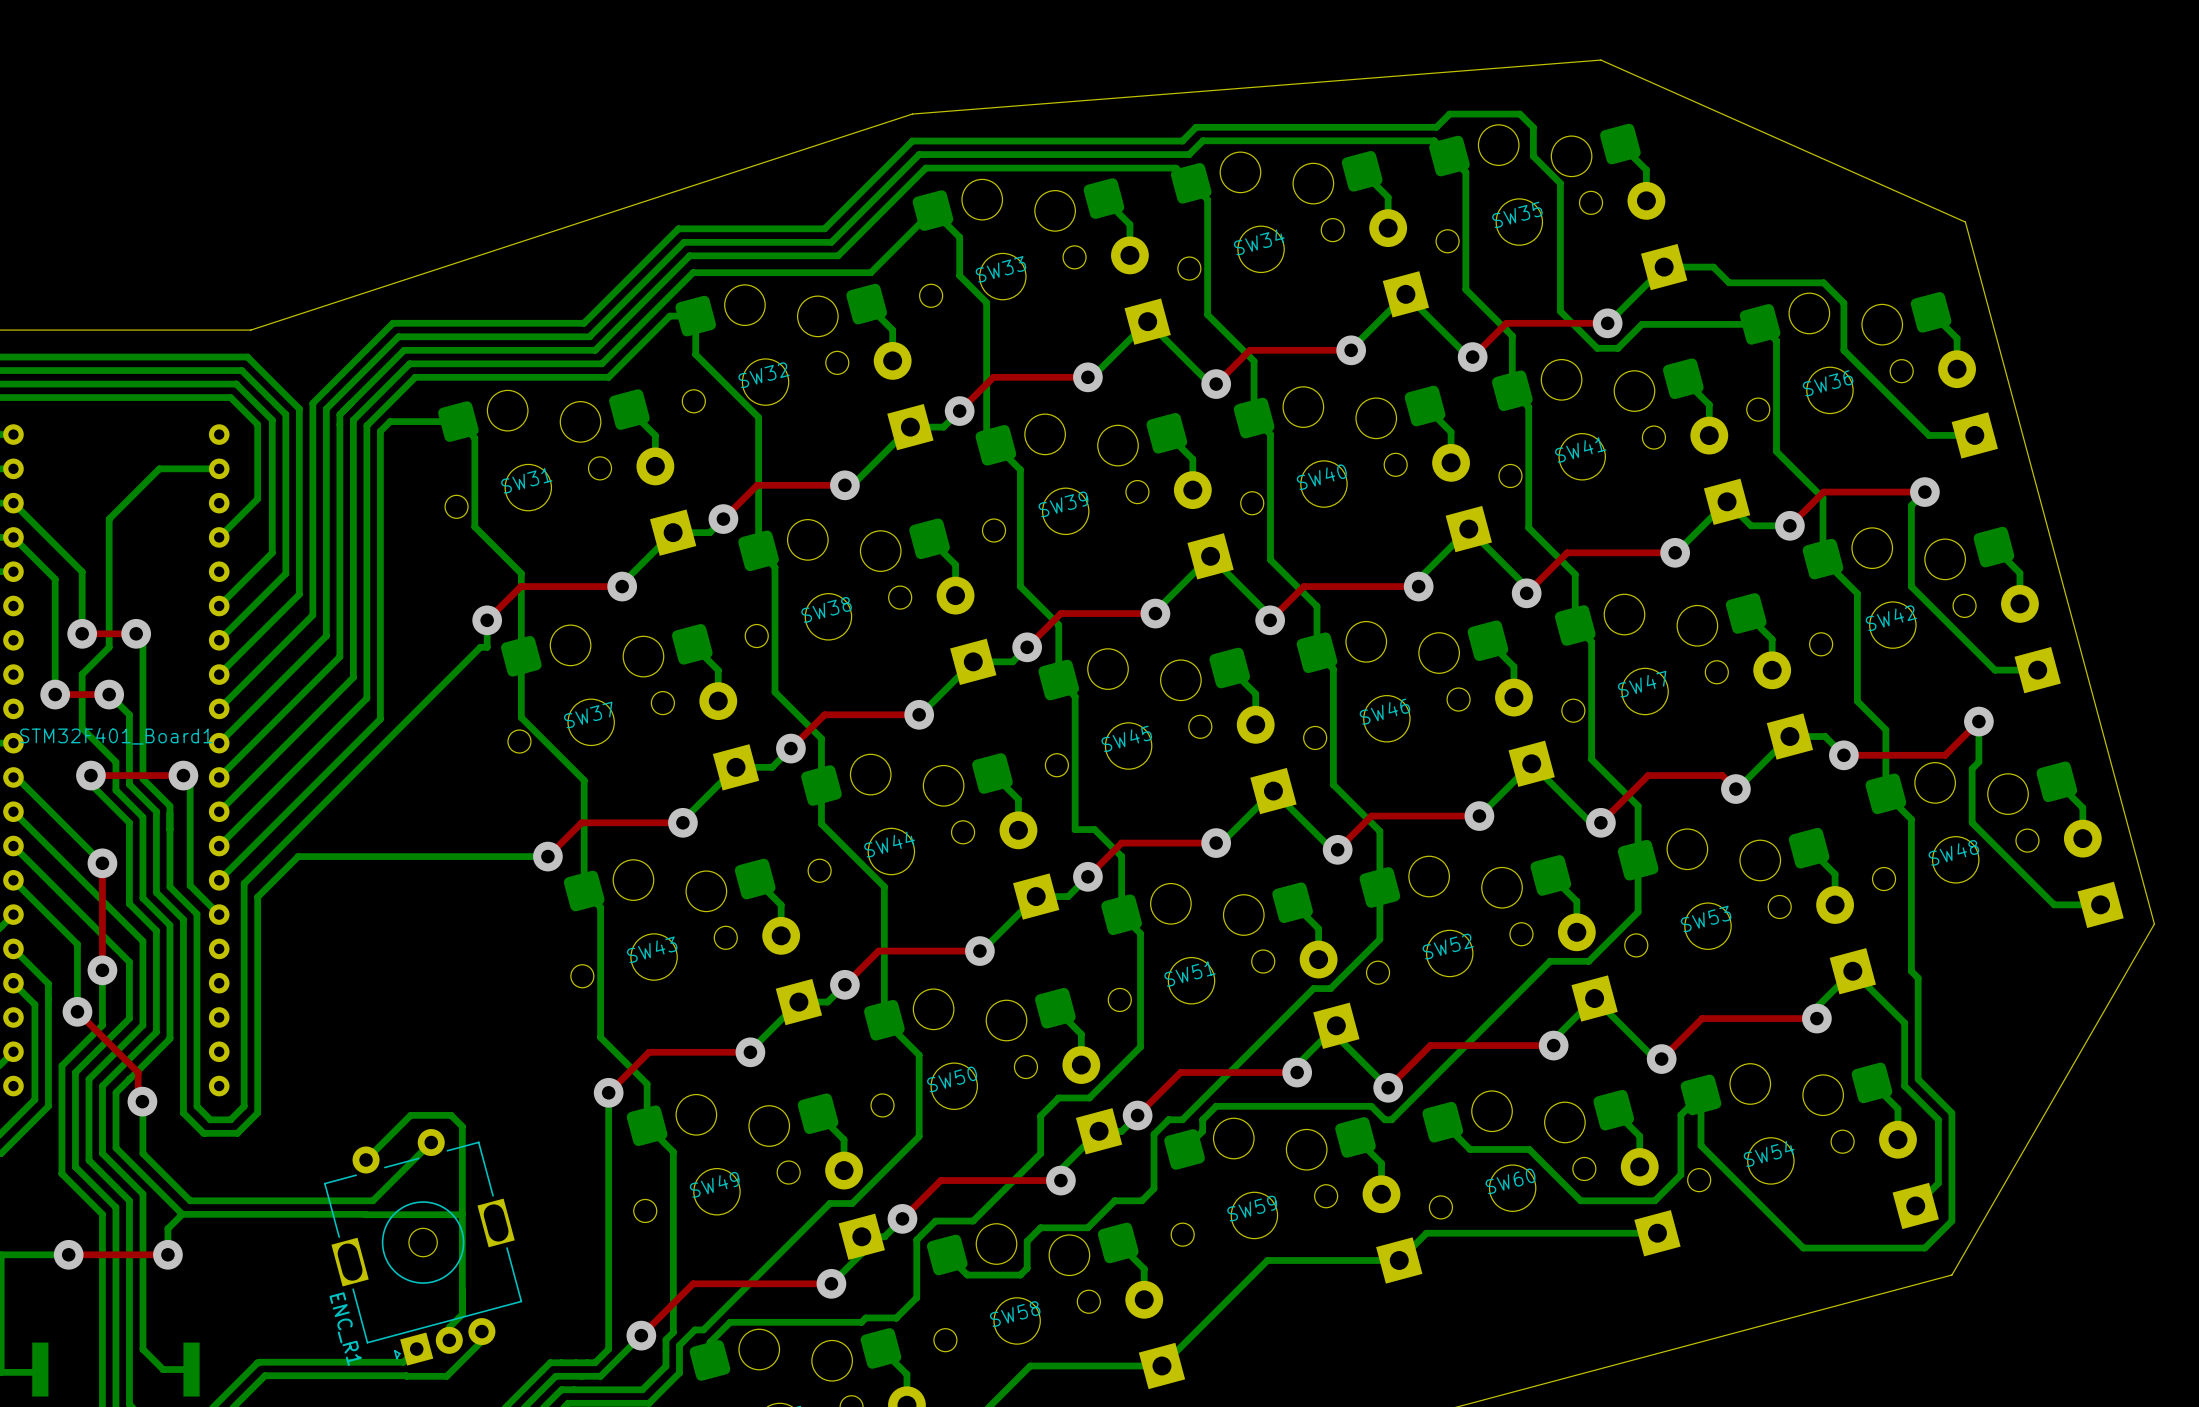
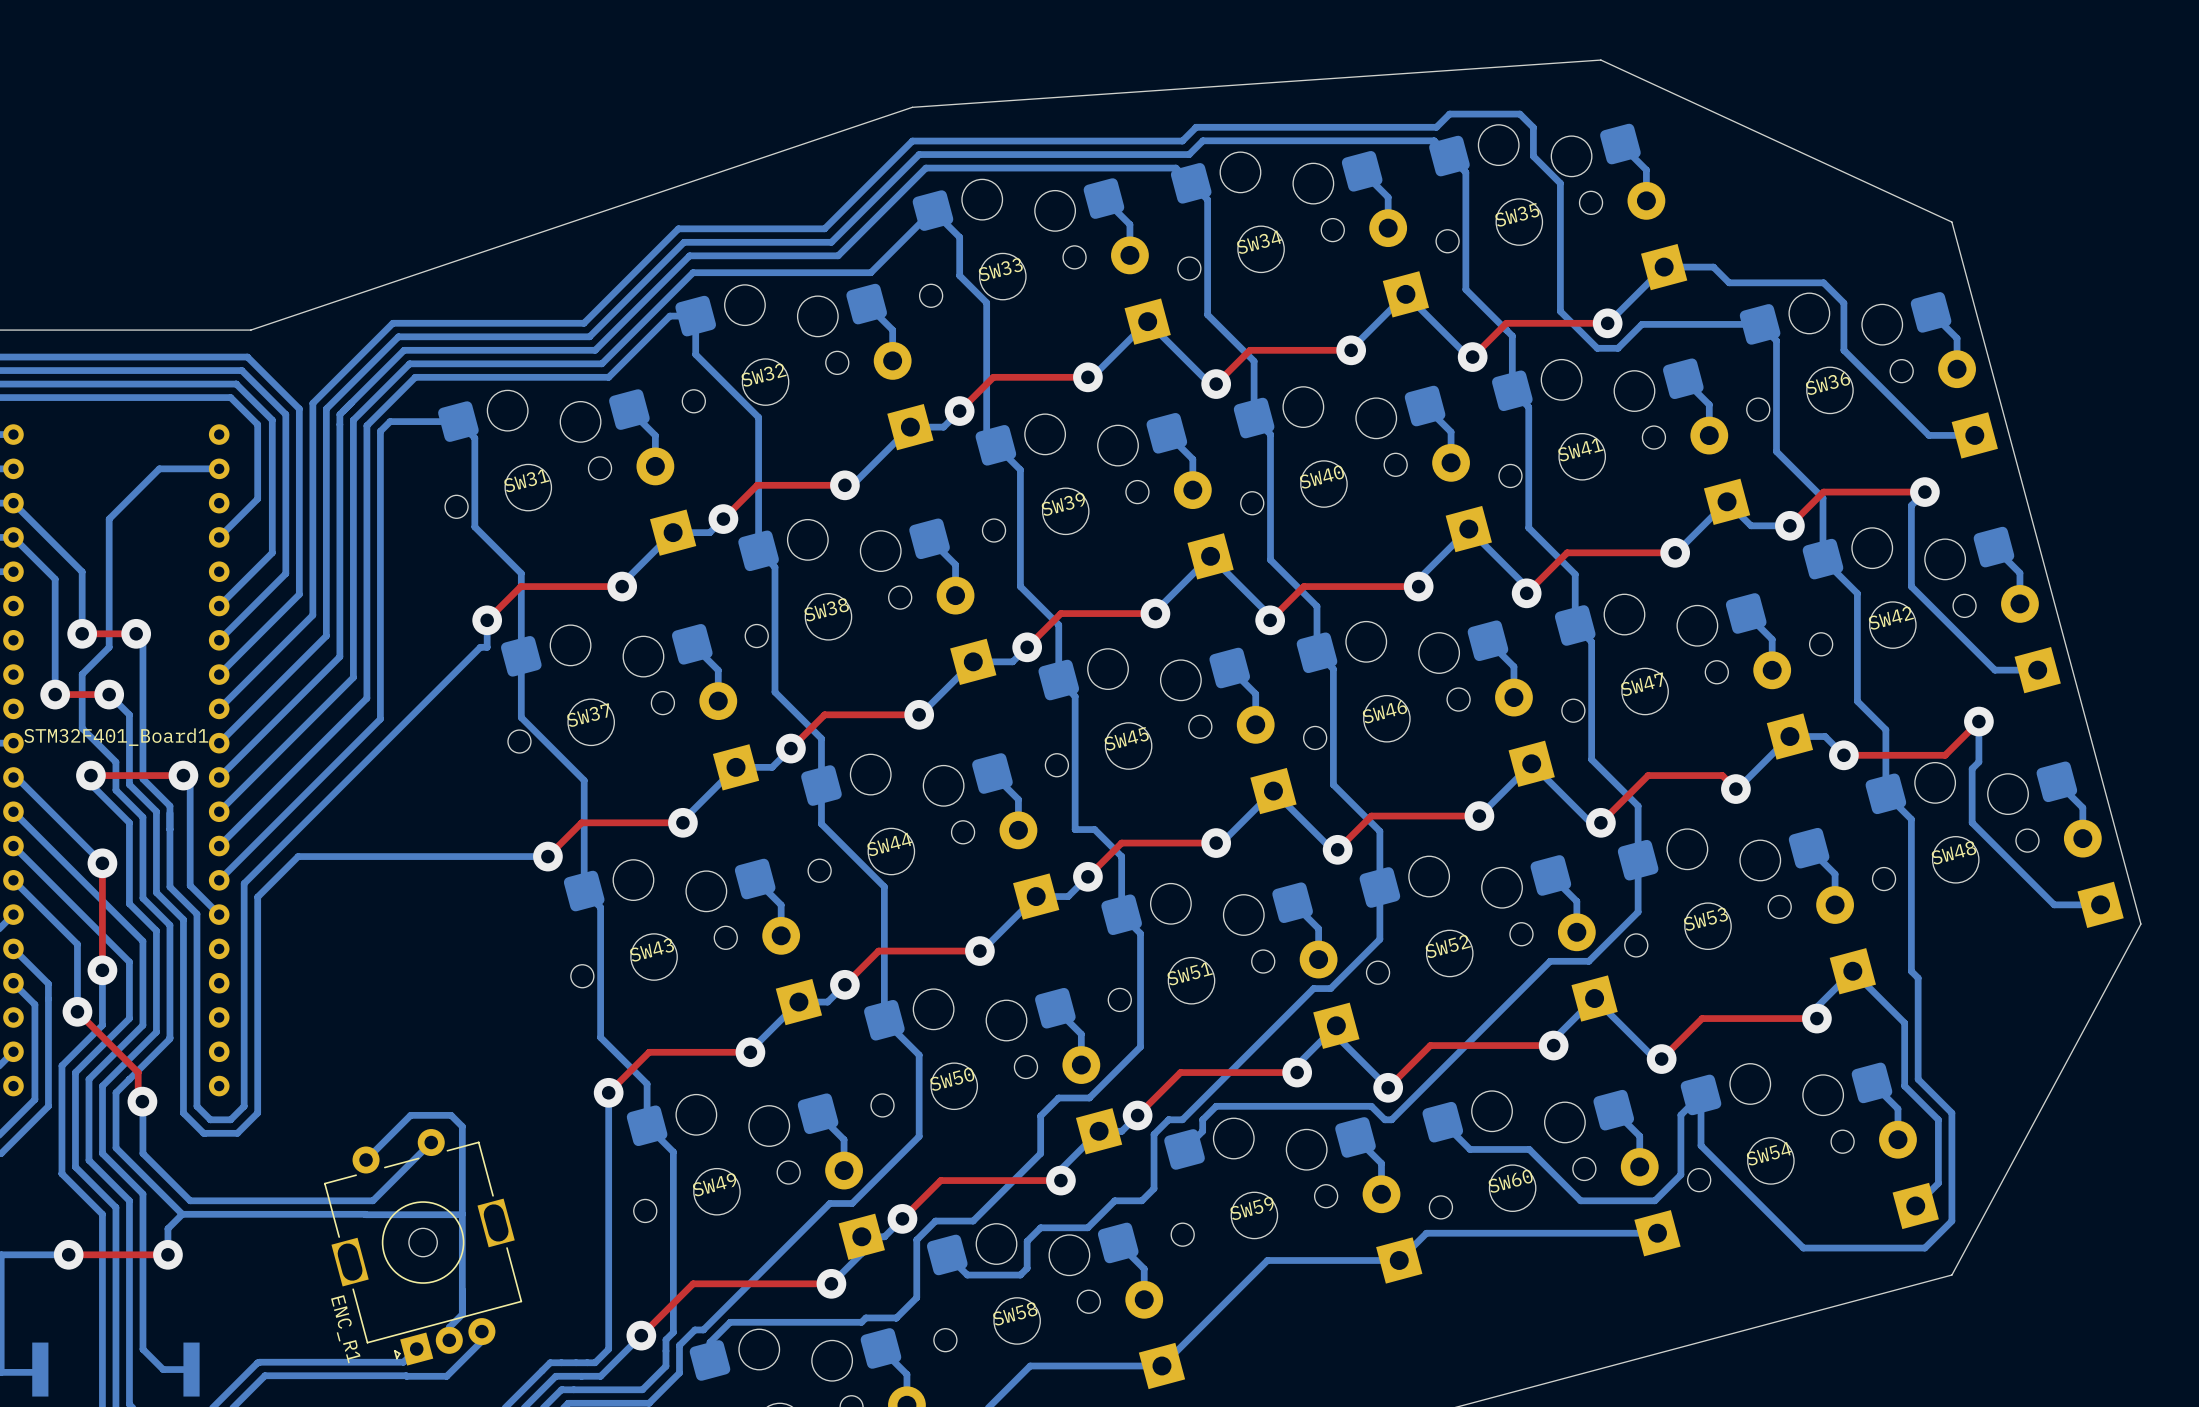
board edge: (250, 330) (912, 114) (1600, 60) (1965, 222) (2154, 924) (1951, 1275) -> (250, 330) (912, 107) (1600, 60) (1951, 222) (2140, 924) (1951, 1275)

